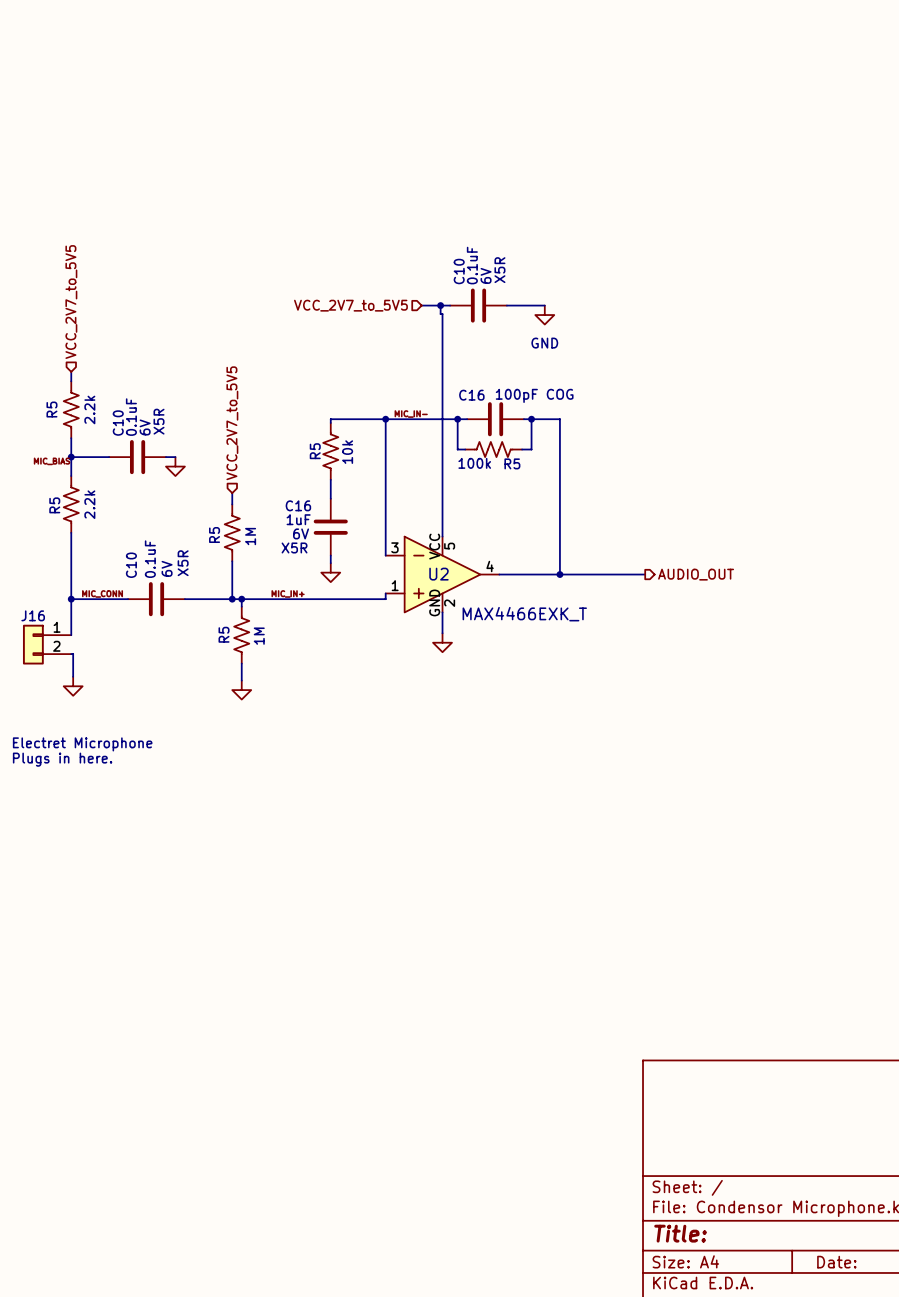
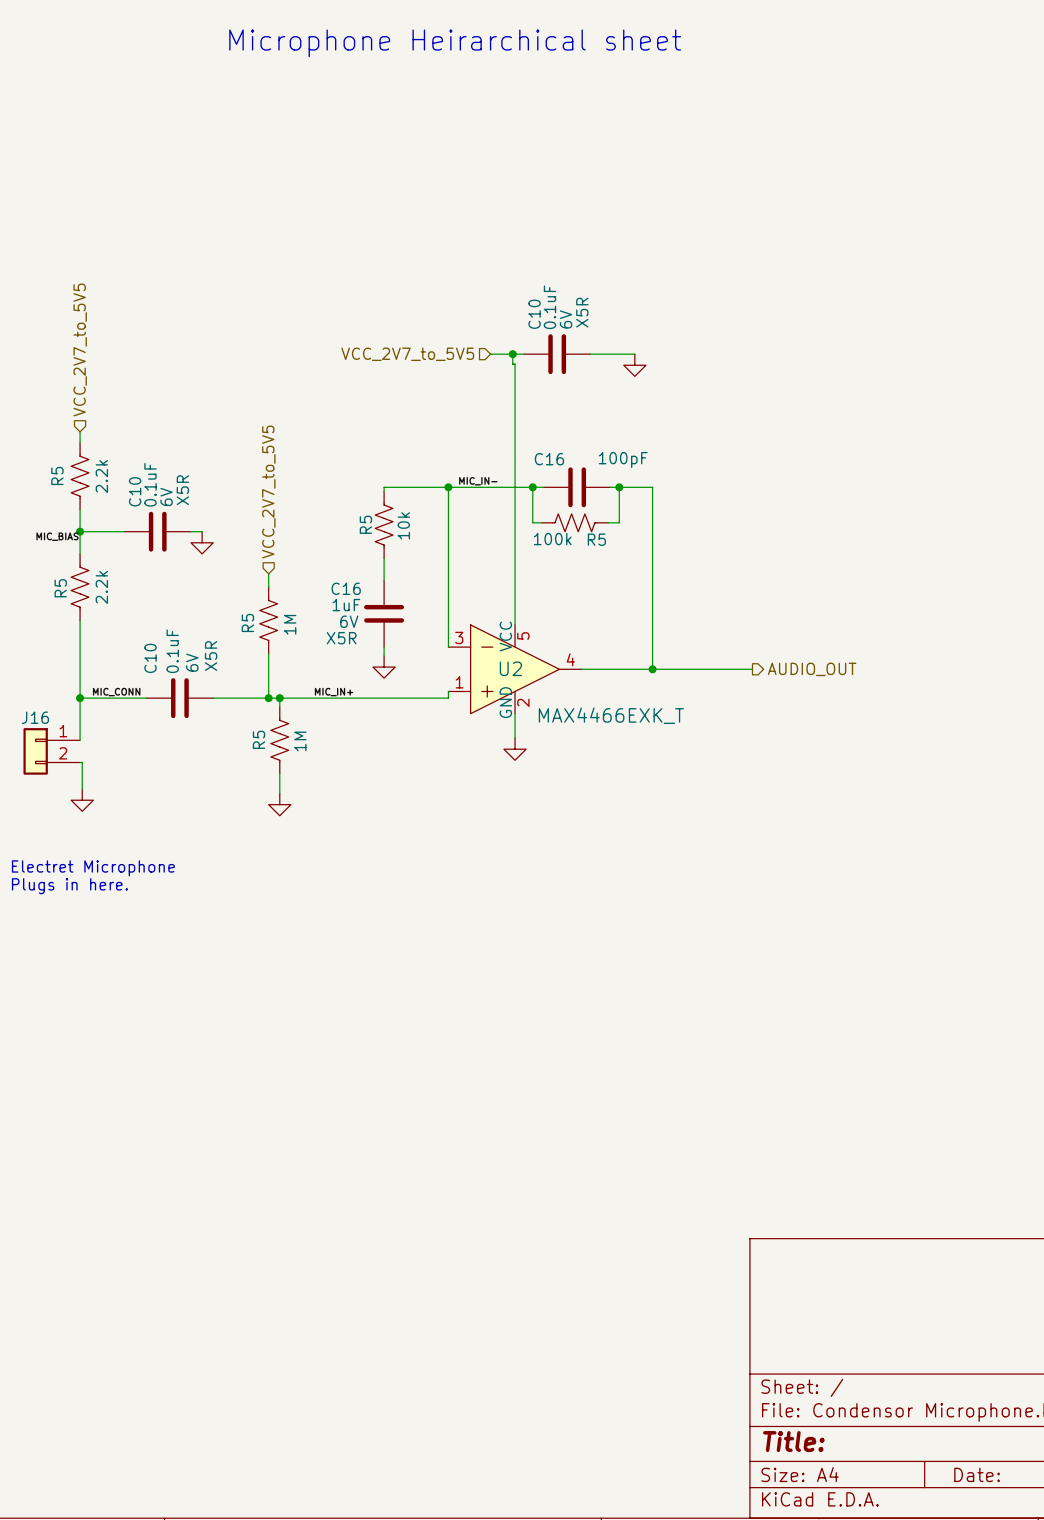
text: none -> Microphone Heirarchical sheet (455, 43)
power symbol text: GND (544, 343) -> none
C16 value: 100pF COG (534, 395) -> 100pF (623, 459)

